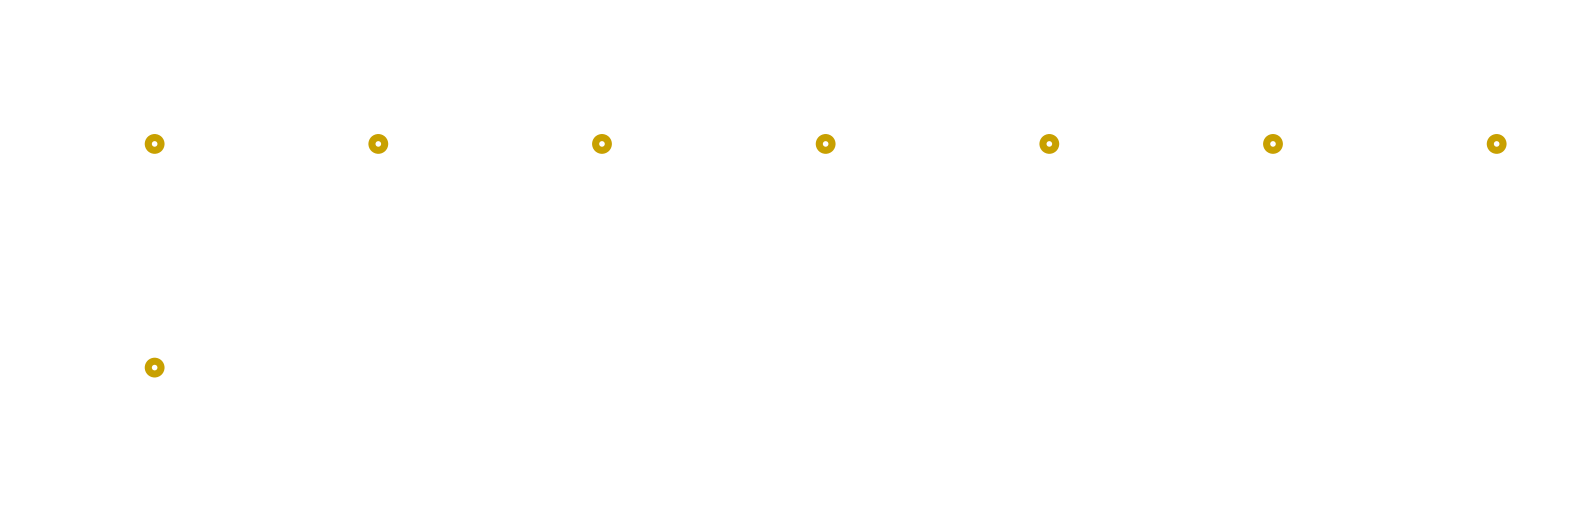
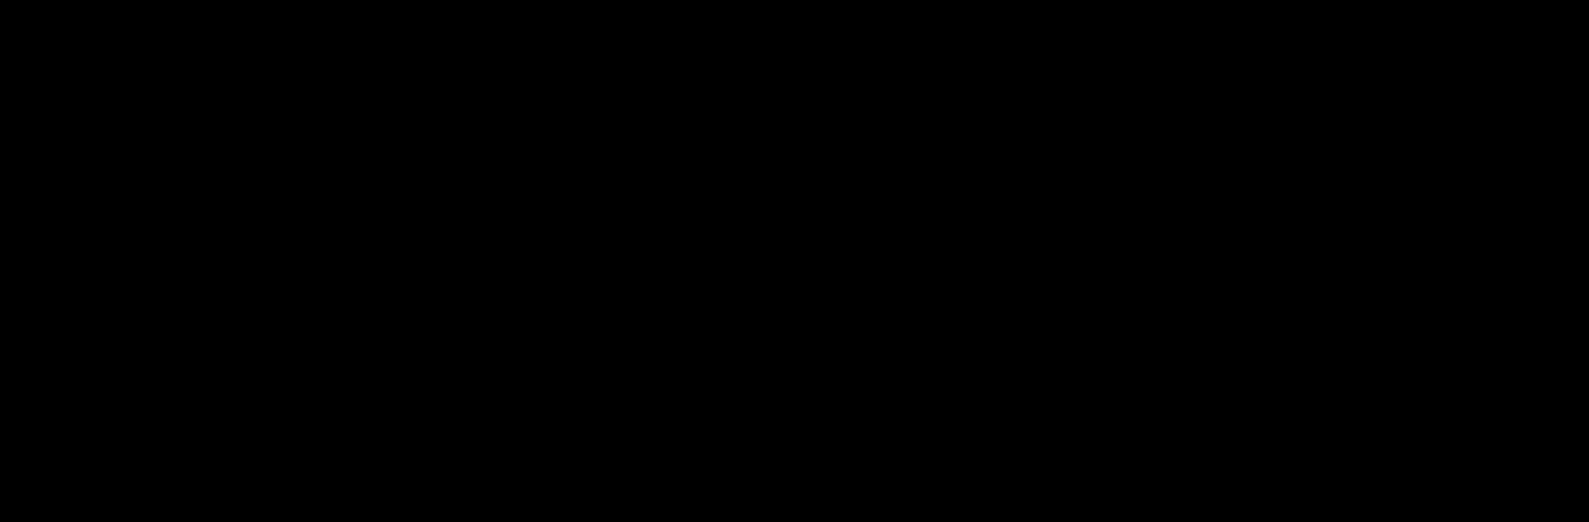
part: (154, 143) -> none
part: (378, 143) -> none
part: (601, 143) -> none
part: (825, 143) -> none
part: (1049, 143) -> none
part: (1272, 143) -> none
part: (1496, 143) -> none
part: (154, 367) -> none

